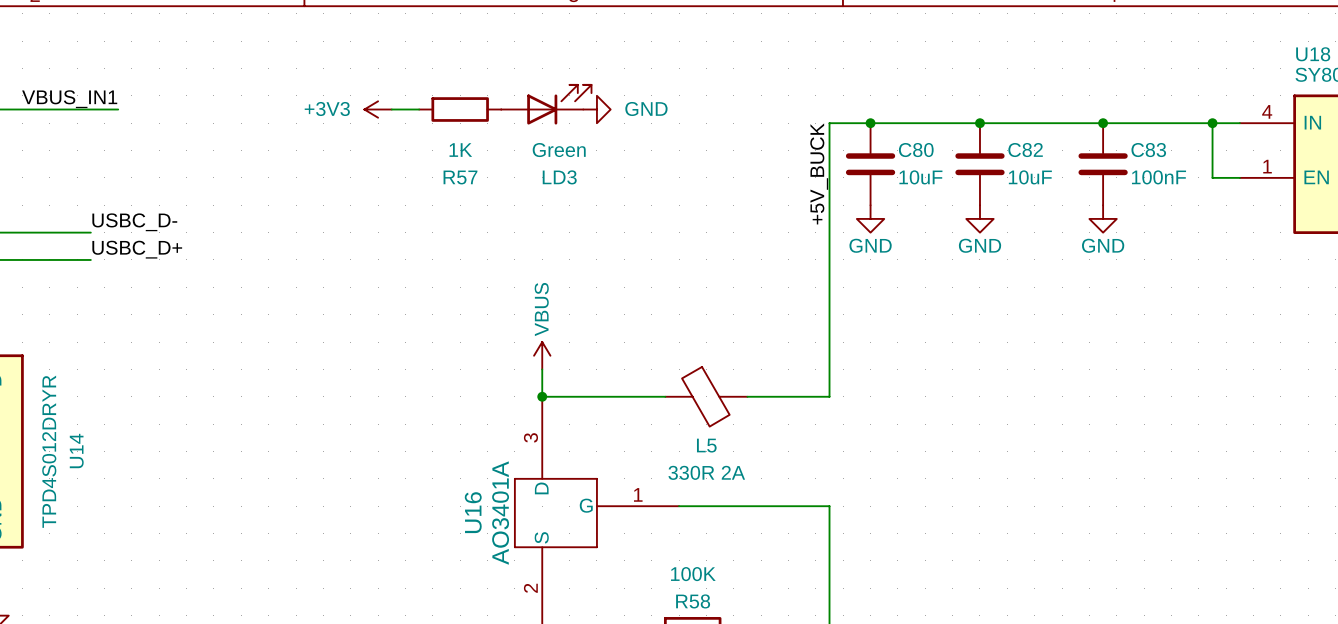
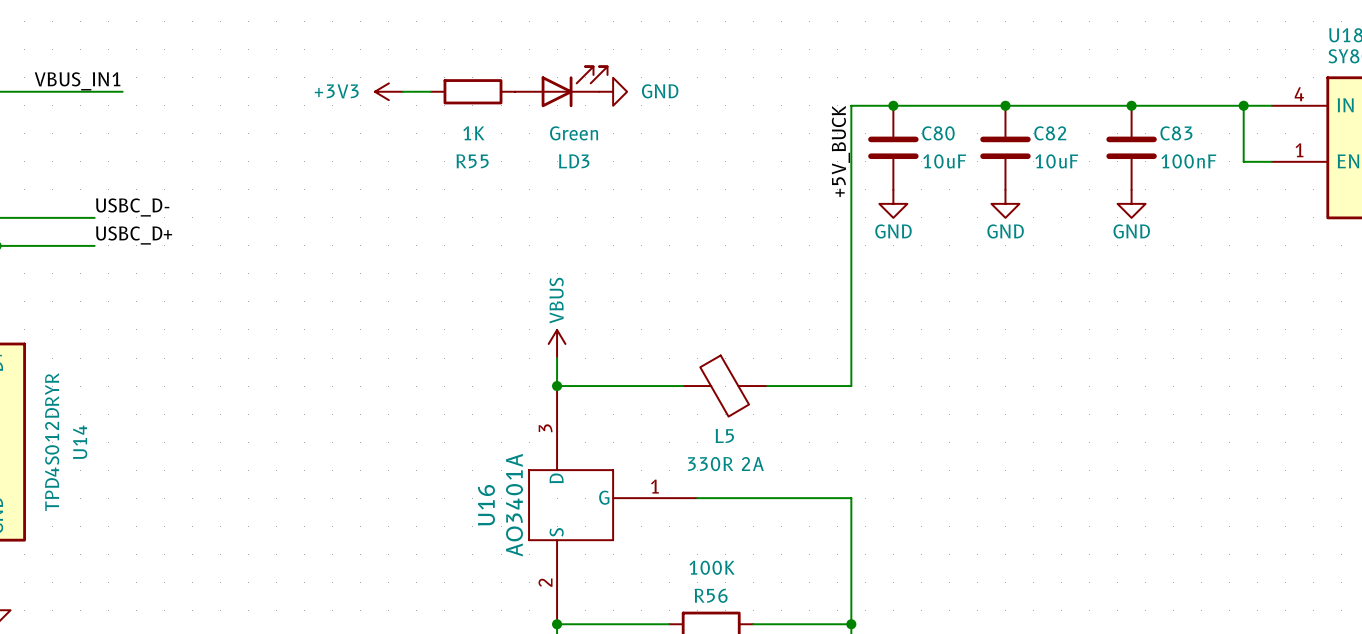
R57 name: R57 (460, 177) -> R55 (472, 161)
R58 name: R58 (693, 601) -> R56 (711, 595)

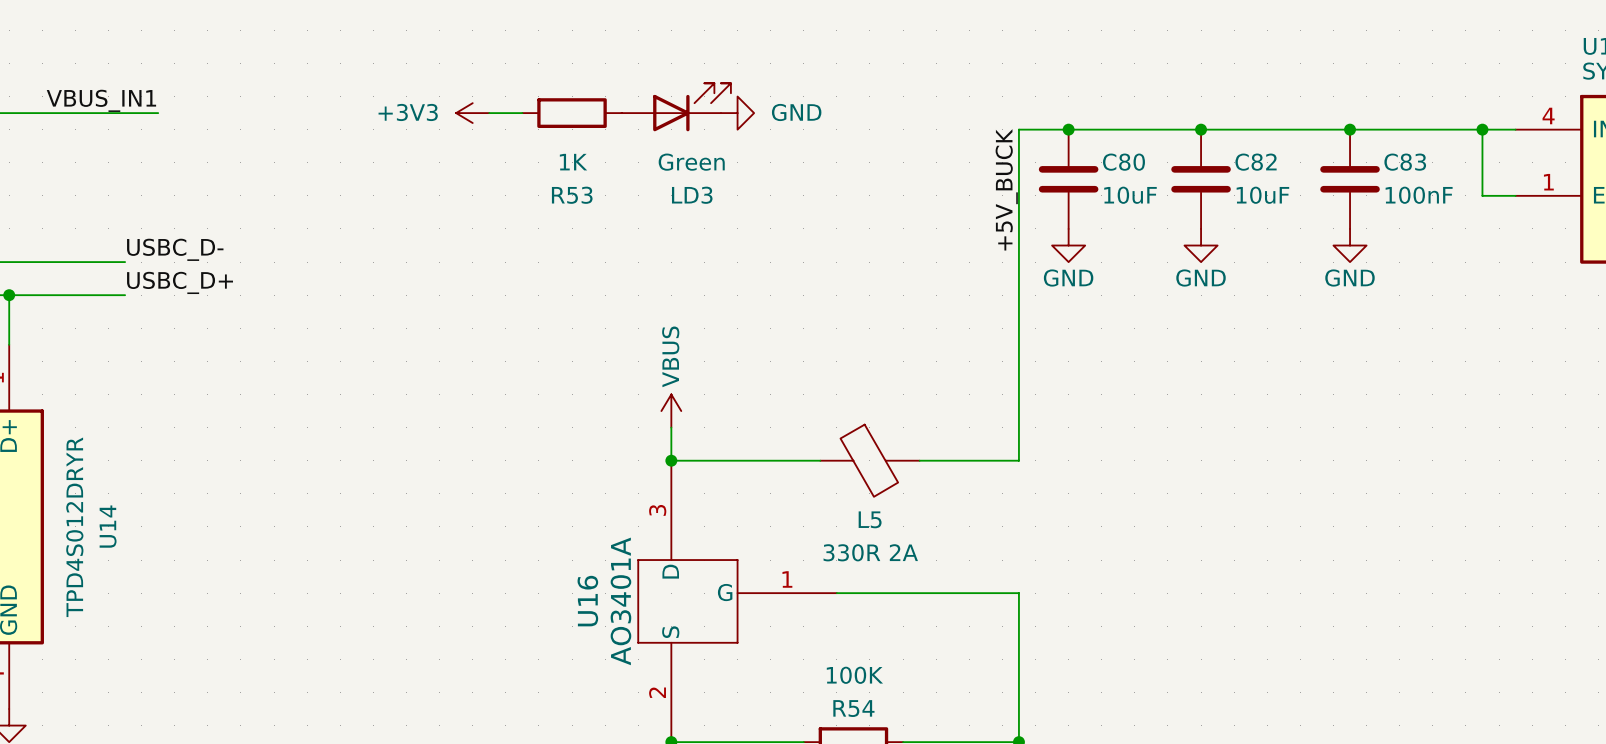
R55 name: R55 (472, 161) -> R53 (572, 195)
R56 name: R56 (711, 595) -> R54 (853, 708)

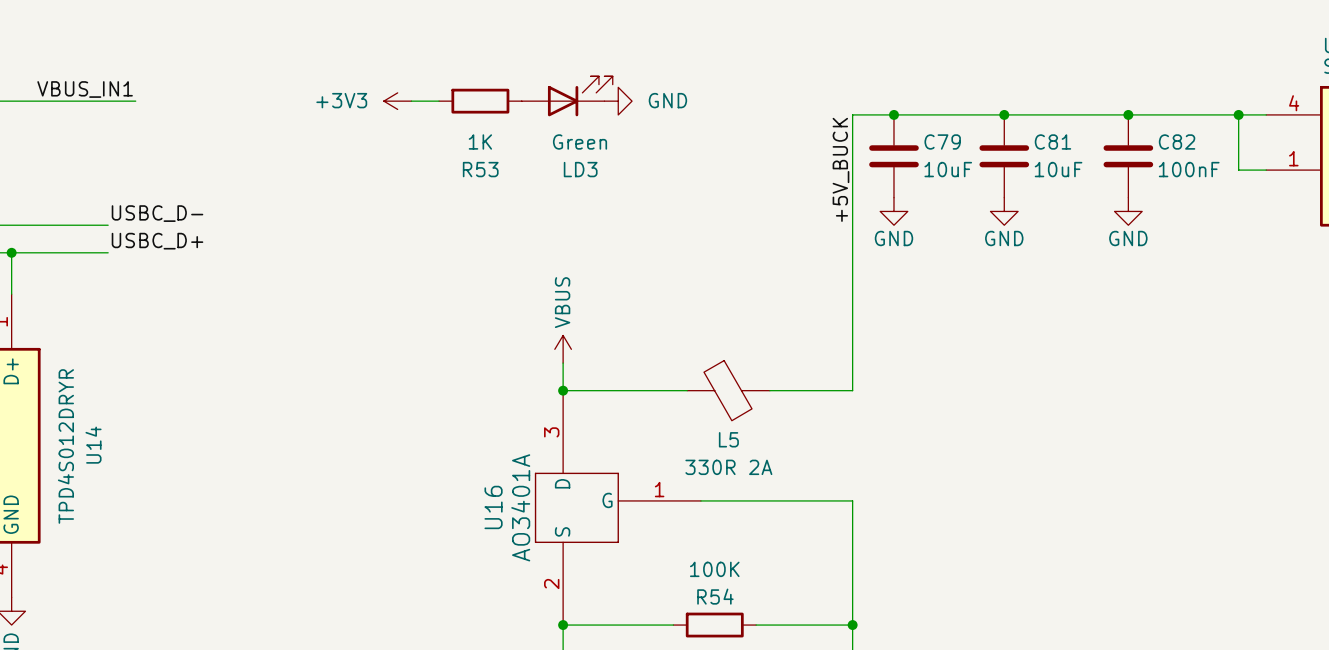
C80 name: C80 (1123, 162) -> C79 (942, 141)
C82 name: C82 (1256, 162) -> C81 (1052, 141)
C83 name: C83 (1405, 162) -> C82 (1177, 141)

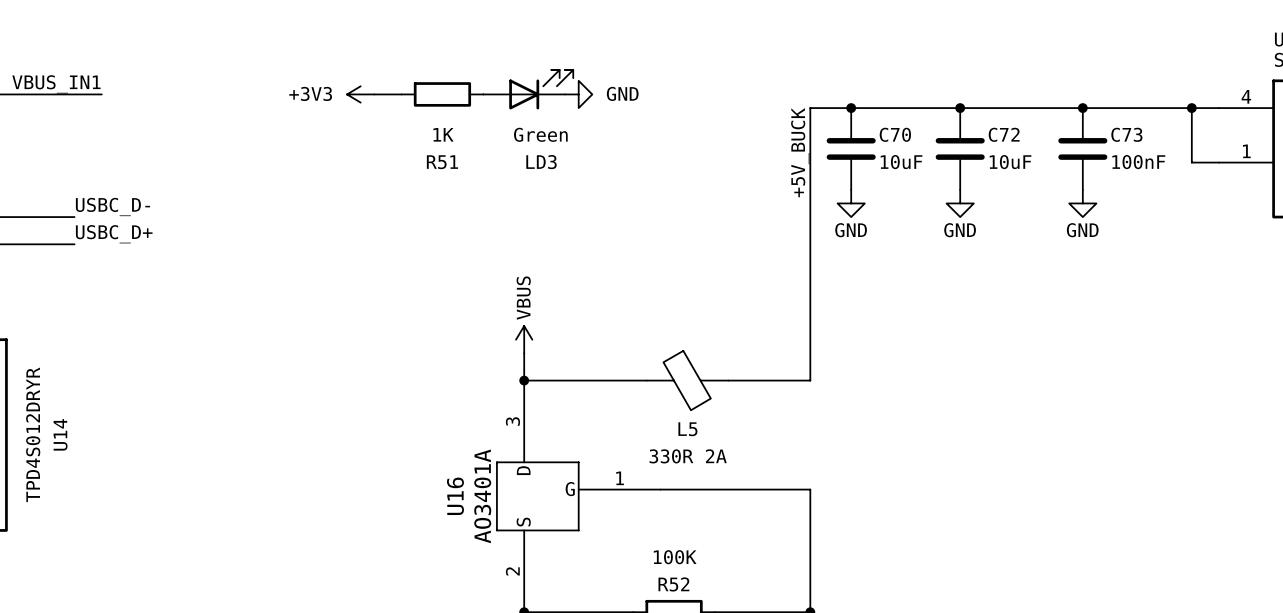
C79 name: C79 (942, 141) -> C70 (895, 134)
C81 name: C81 (1052, 141) -> C72 (1004, 134)
C82 name: C82 (1177, 141) -> C73 (1126, 134)
R53 name: R53 (480, 169) -> R51 (442, 162)
R54 name: R54 (715, 596) -> R52 (673, 584)

